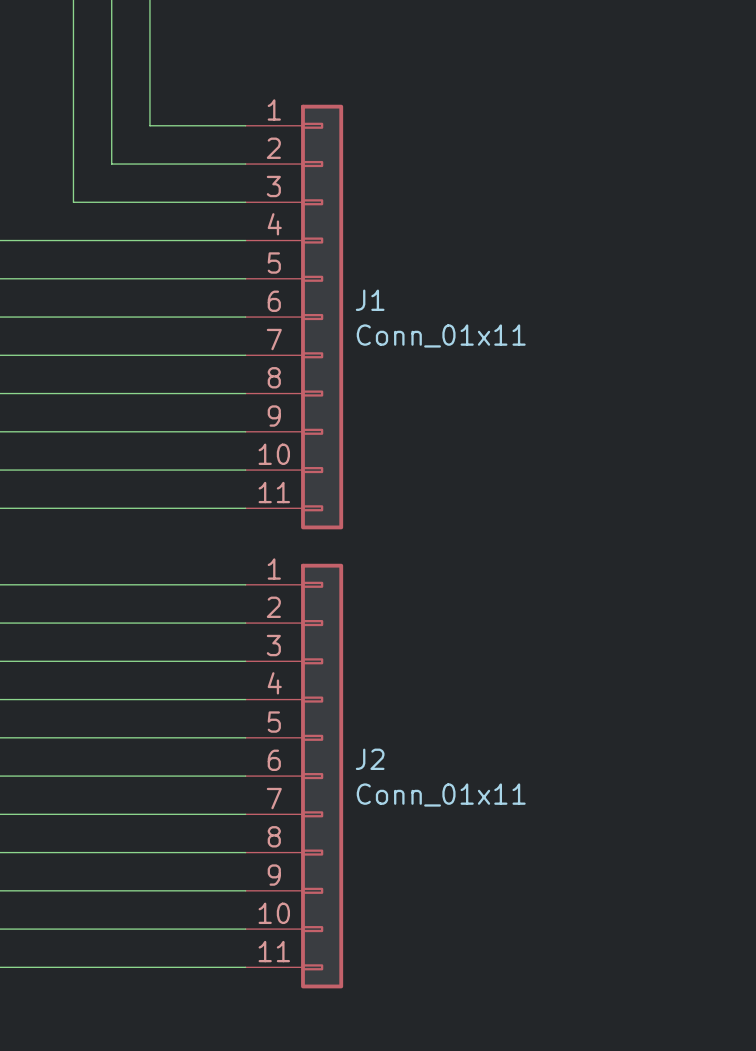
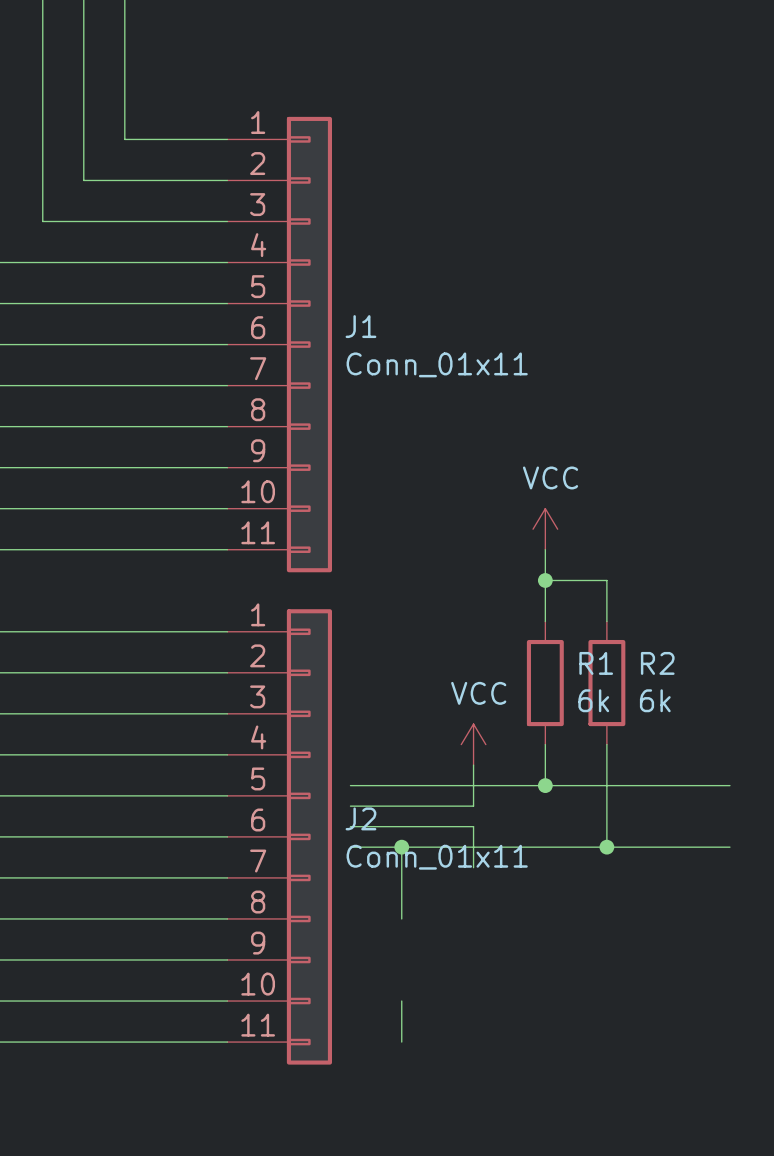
power symbol: none -> VCC (545, 529)
wire: none -> (545, 549) (545, 621)
wire: none -> (545, 580) (606, 580) (606, 621)
junction: none -> (545, 580)
R1: none -> 6k (545, 683)
R2: none -> 6k (606, 683)
power symbol: none -> VCC (473, 744)
wire: none -> (545, 744) (545, 785)
wire: none -> (606, 744) (606, 847)
wire: none -> (473, 765) (473, 806) (350, 806)
wire: none -> (350, 785) (729, 785)
junction: none -> (545, 785)
wire: none -> (350, 826) (473, 826) (473, 867)
wire: none -> (350, 847) (729, 847)
wire: none -> (401, 847) (401, 918)
junction: none -> (401, 847)
junction: none -> (606, 847)
wire: none -> (401, 1001) (401, 1042)

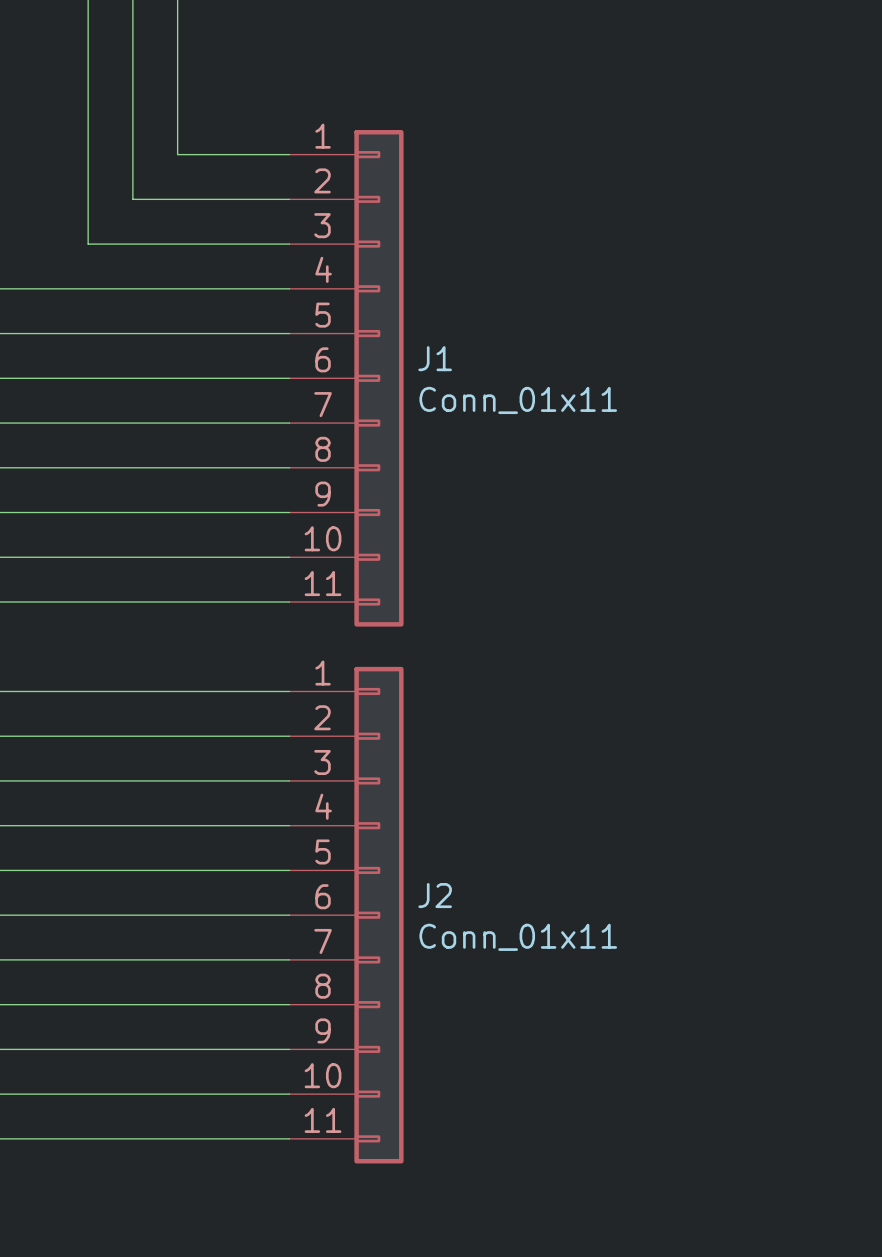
power symbol: VCC (545, 529) -> none
wire: (545, 549) (545, 621) -> none
wire: (545, 580) (606, 580) (606, 621) -> none
junction: (545, 580) -> none
R1: 6k (545, 683) -> none
R2: 6k (606, 683) -> none
power symbol: VCC (473, 744) -> none
wire: (545, 744) (545, 785) -> none
wire: (606, 744) (606, 847) -> none
wire: (473, 765) (473, 806) (350, 806) -> none
wire: (350, 785) (729, 785) -> none
junction: (545, 785) -> none
wire: (350, 826) (473, 826) (473, 867) -> none
wire: (350, 847) (729, 847) -> none
wire: (401, 847) (401, 918) -> none
junction: (401, 847) -> none
junction: (606, 847) -> none
wire: (401, 1001) (401, 1042) -> none

